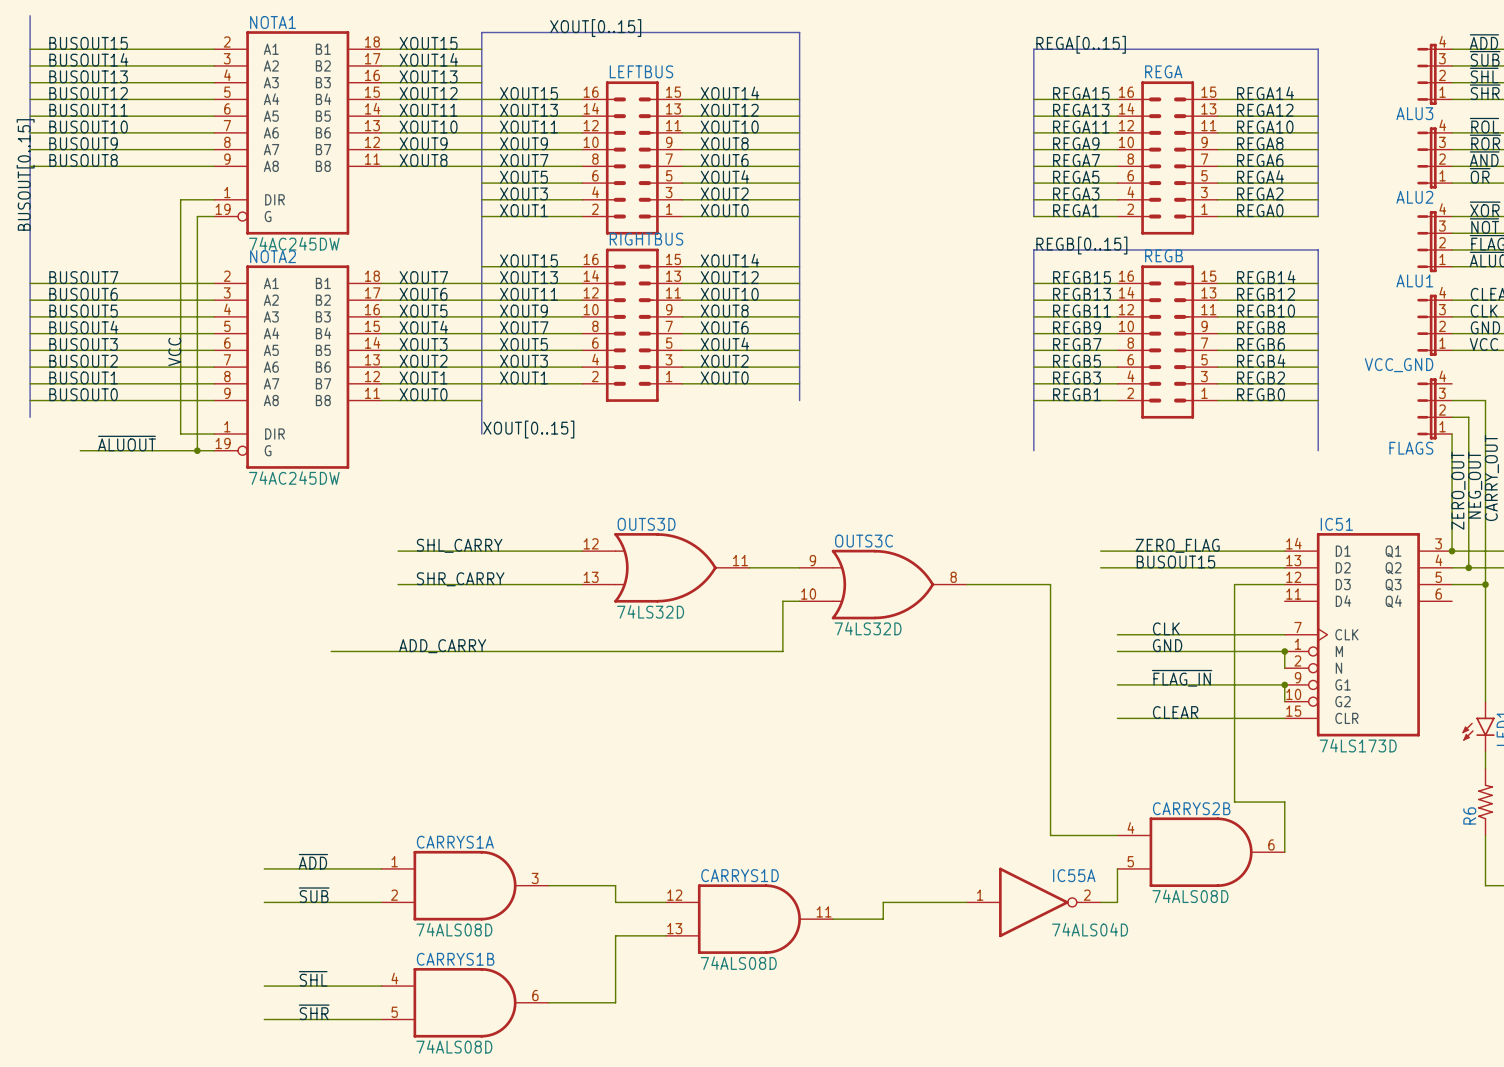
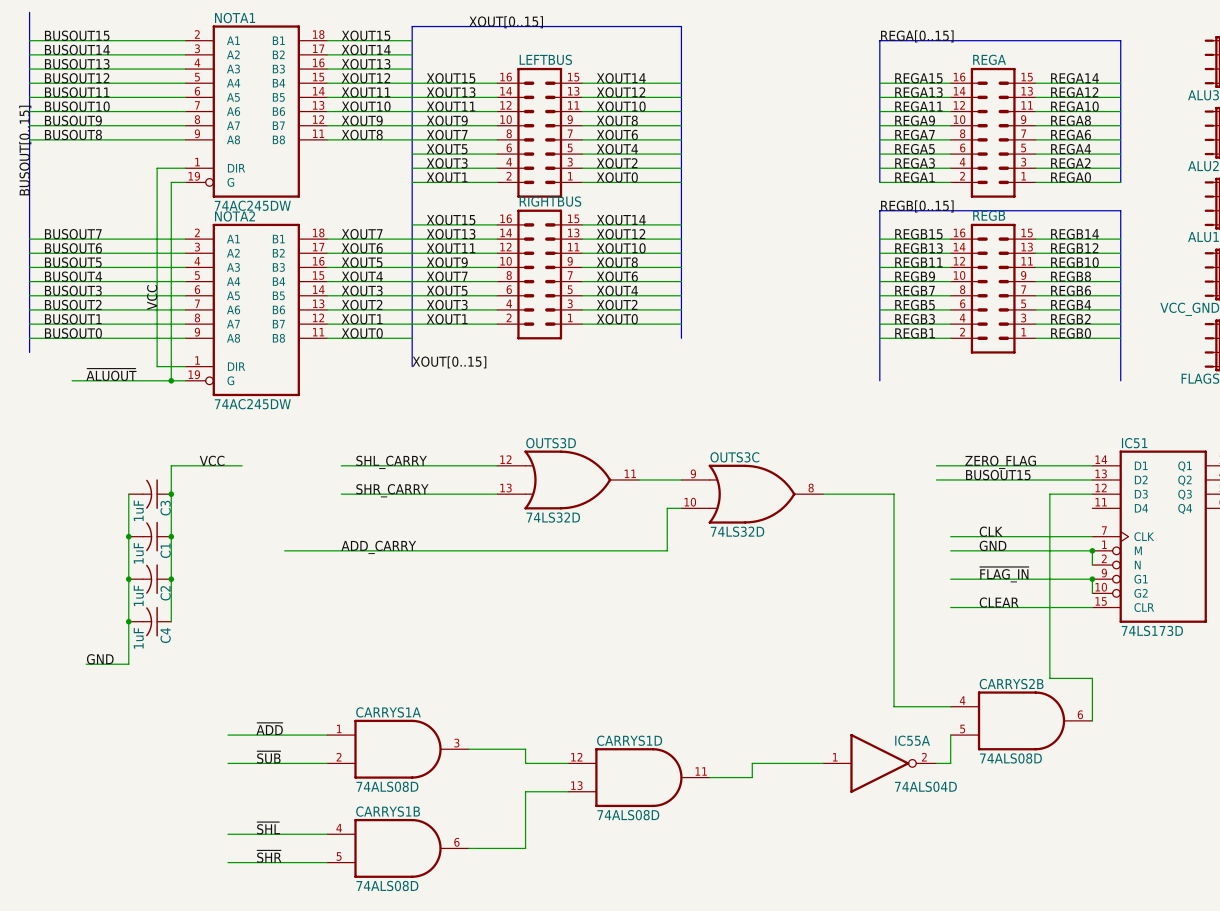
label: none -> VCC (212, 460)
wire: none -> (242, 465) (171, 465) (171, 621)
wire: none -> (128, 494) (128, 664) (86, 664)
C3: none -> 1uF (150, 494)
junction: none -> (171, 494)
junction: none -> (128, 536)
C1: none -> 1uF (150, 536)
junction: none -> (171, 536)
junction: none -> (128, 579)
C2: none -> 1uF (150, 579)
junction: none -> (171, 579)
junction: none -> (128, 621)
C4: none -> 1uF (150, 621)
label: none -> GND (100, 659)

